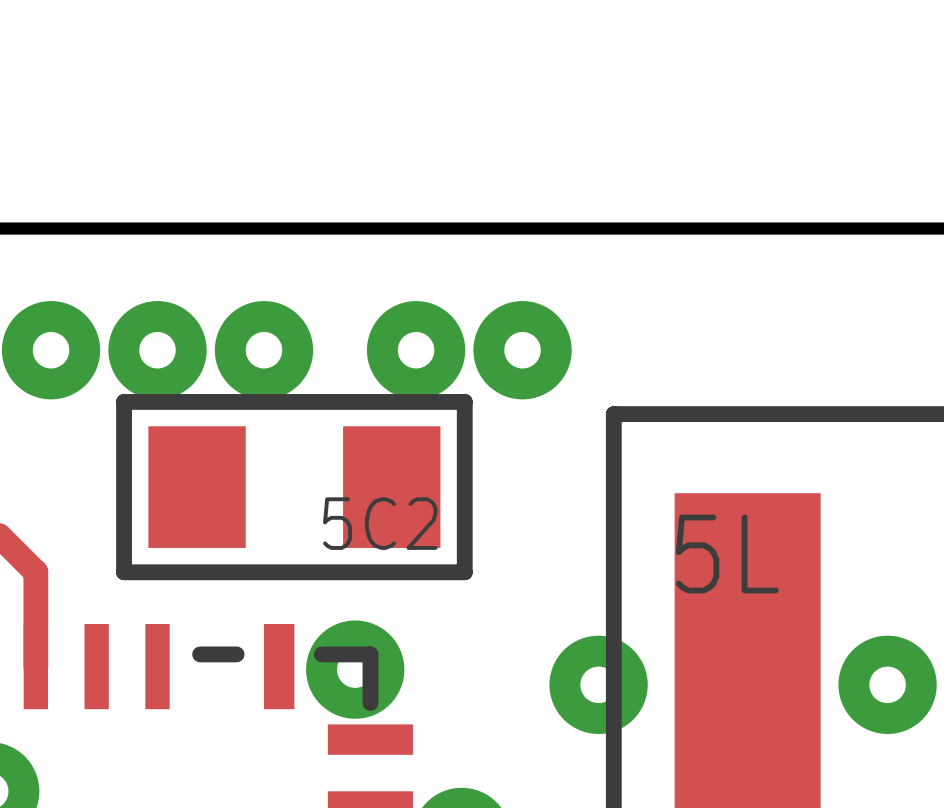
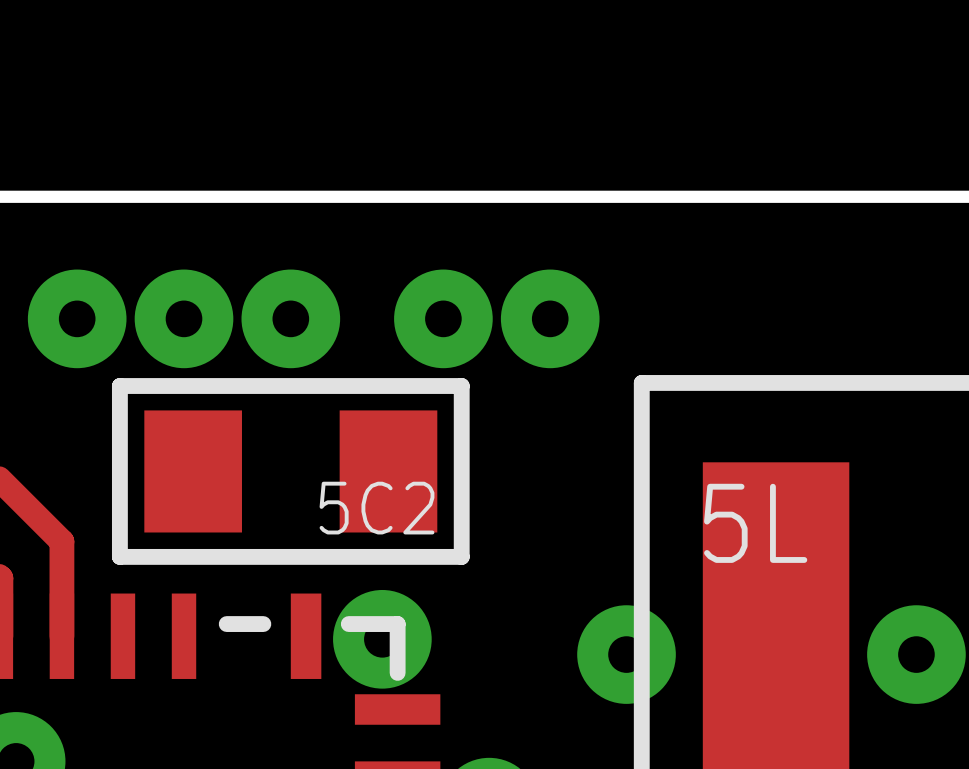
5C2 position: (294, 487) -> (290, 471)

